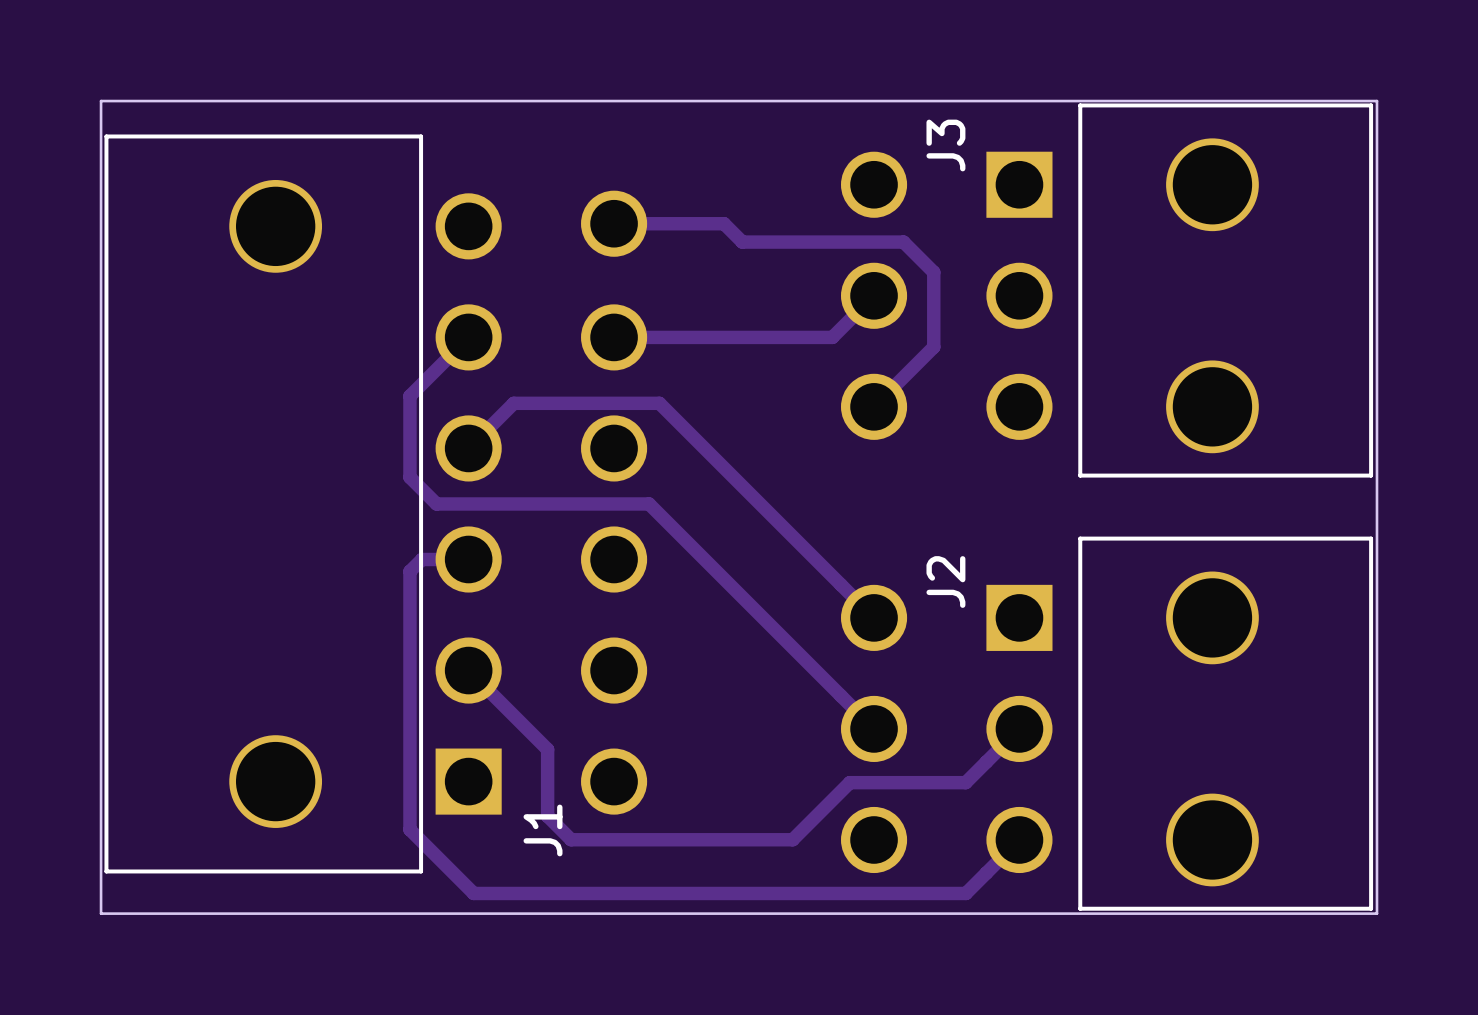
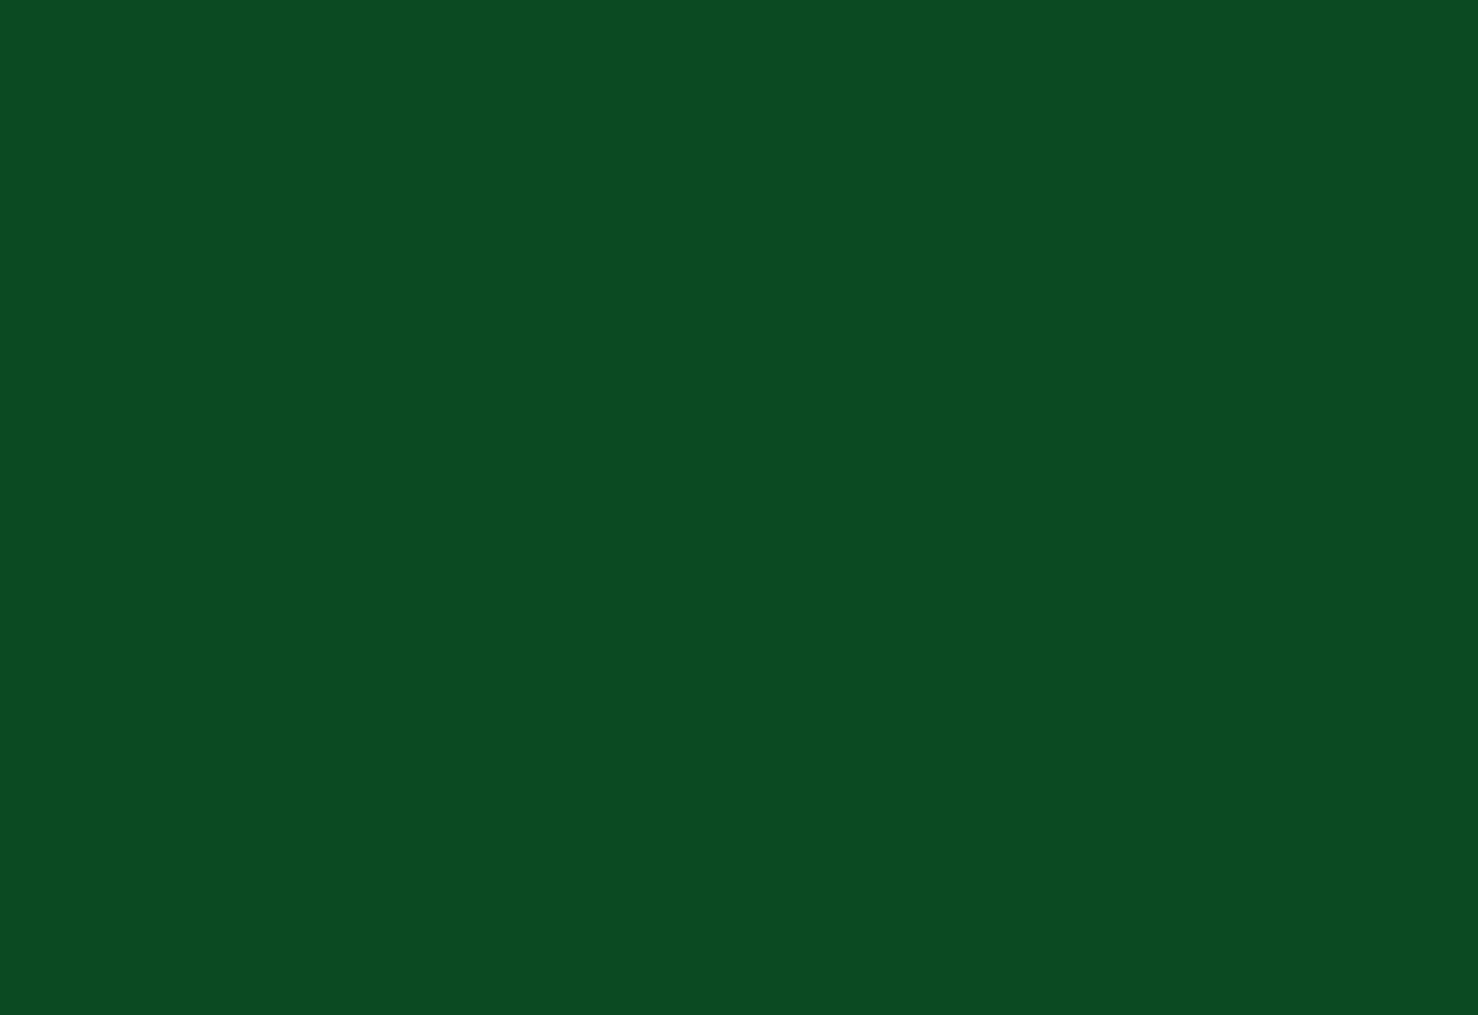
board edge: (101, 101) (1376, 101) (1376, 913) (101, 913) (101, 101) -> none
track: (614, 223) (724, 223) (742, 242) (903, 242) (933, 272) (933, 347) (874, 406) -> none
J3: (1107, 290) -> none
track: (874, 295) (832, 337) (614, 337) -> none
track: (468, 337) (409, 396) (409, 477) (436, 503) (649, 503) (874, 728) -> none
track: (468, 448) (513, 403) (659, 403) (874, 617) -> none
J1: (375, 503) -> none
track: (468, 559) (421, 559) (409, 571) (409, 829) (473, 893) (965, 893) (1019, 839) -> none
track: (468, 670) (547, 749) (547, 816) (571, 839) (792, 839) (849, 782) (965, 782) (1019, 728) -> none
J2: (1107, 723) -> none

